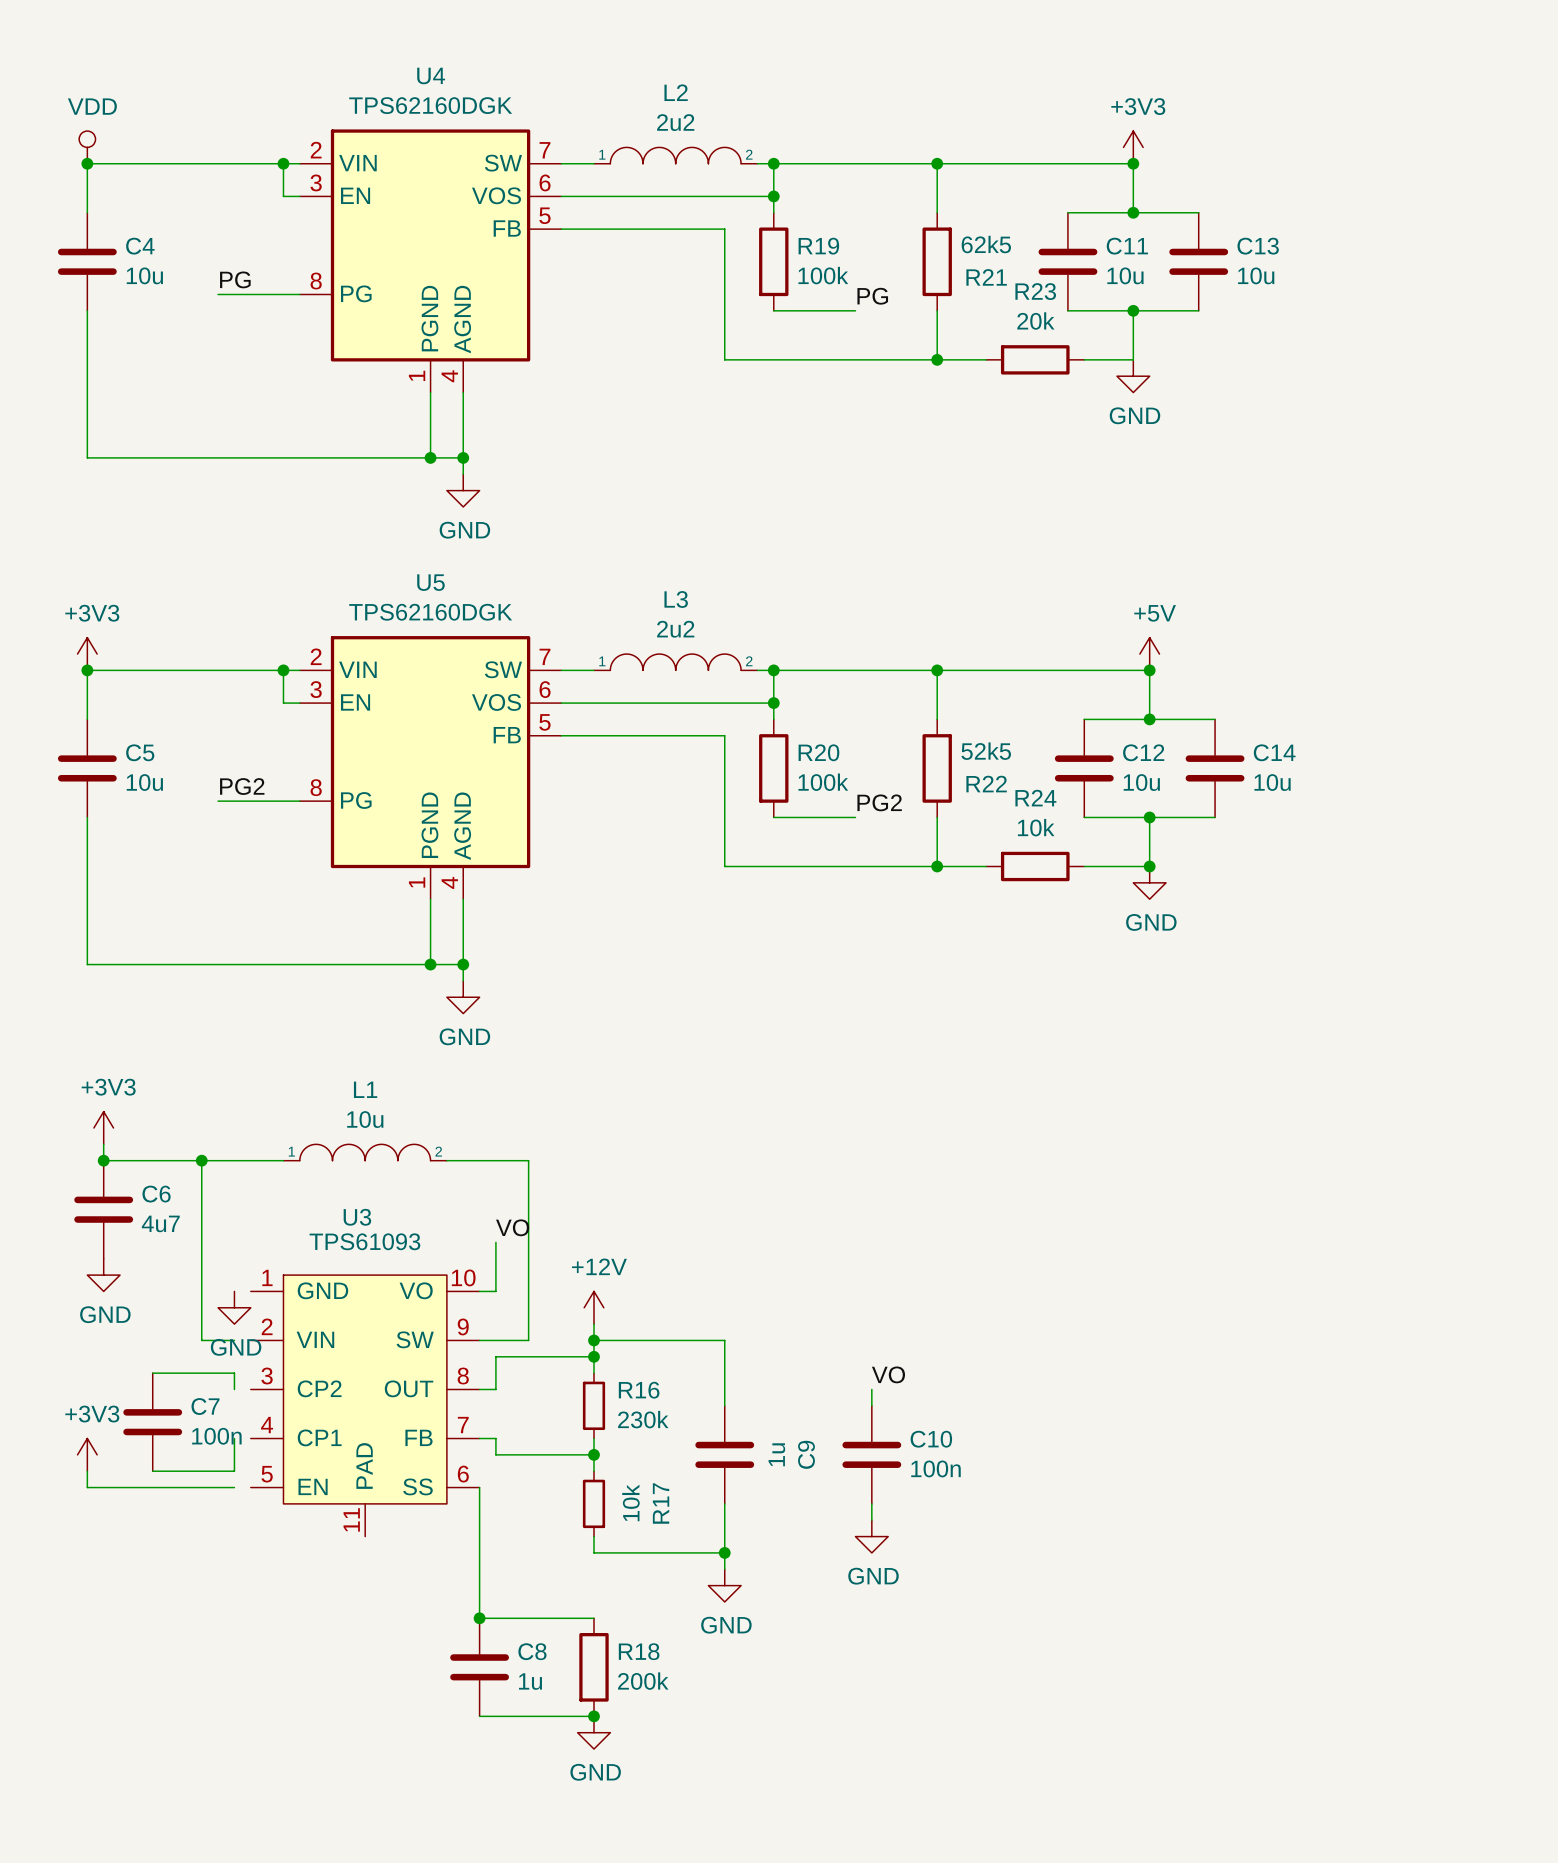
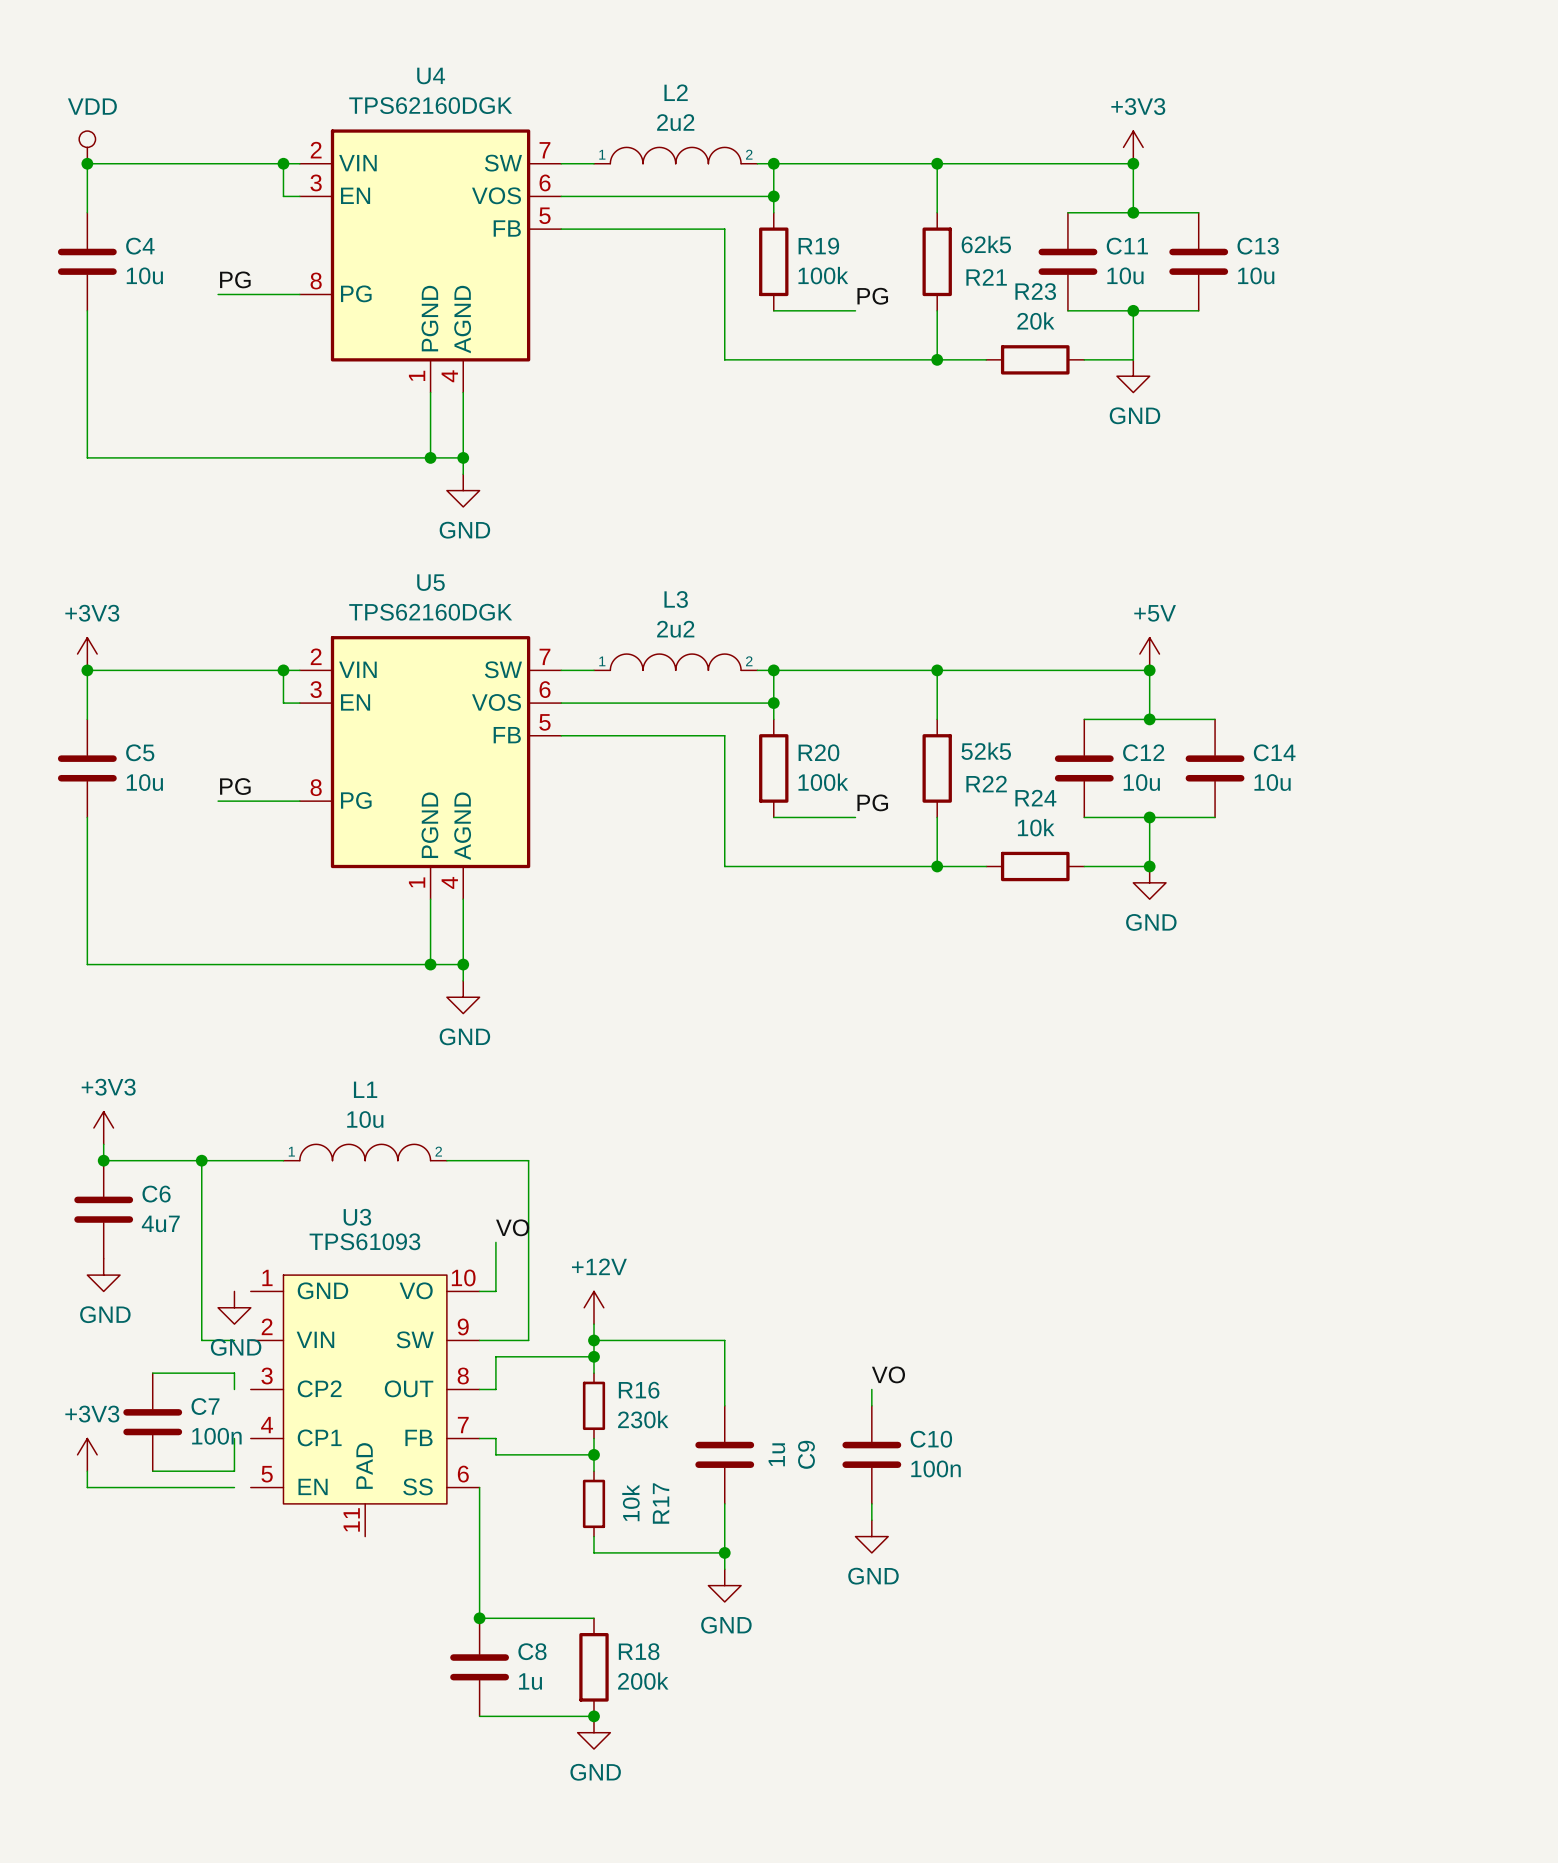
label: PG2 (242, 786) -> PG (235, 786)
label: PG2 (879, 802) -> PG (872, 802)

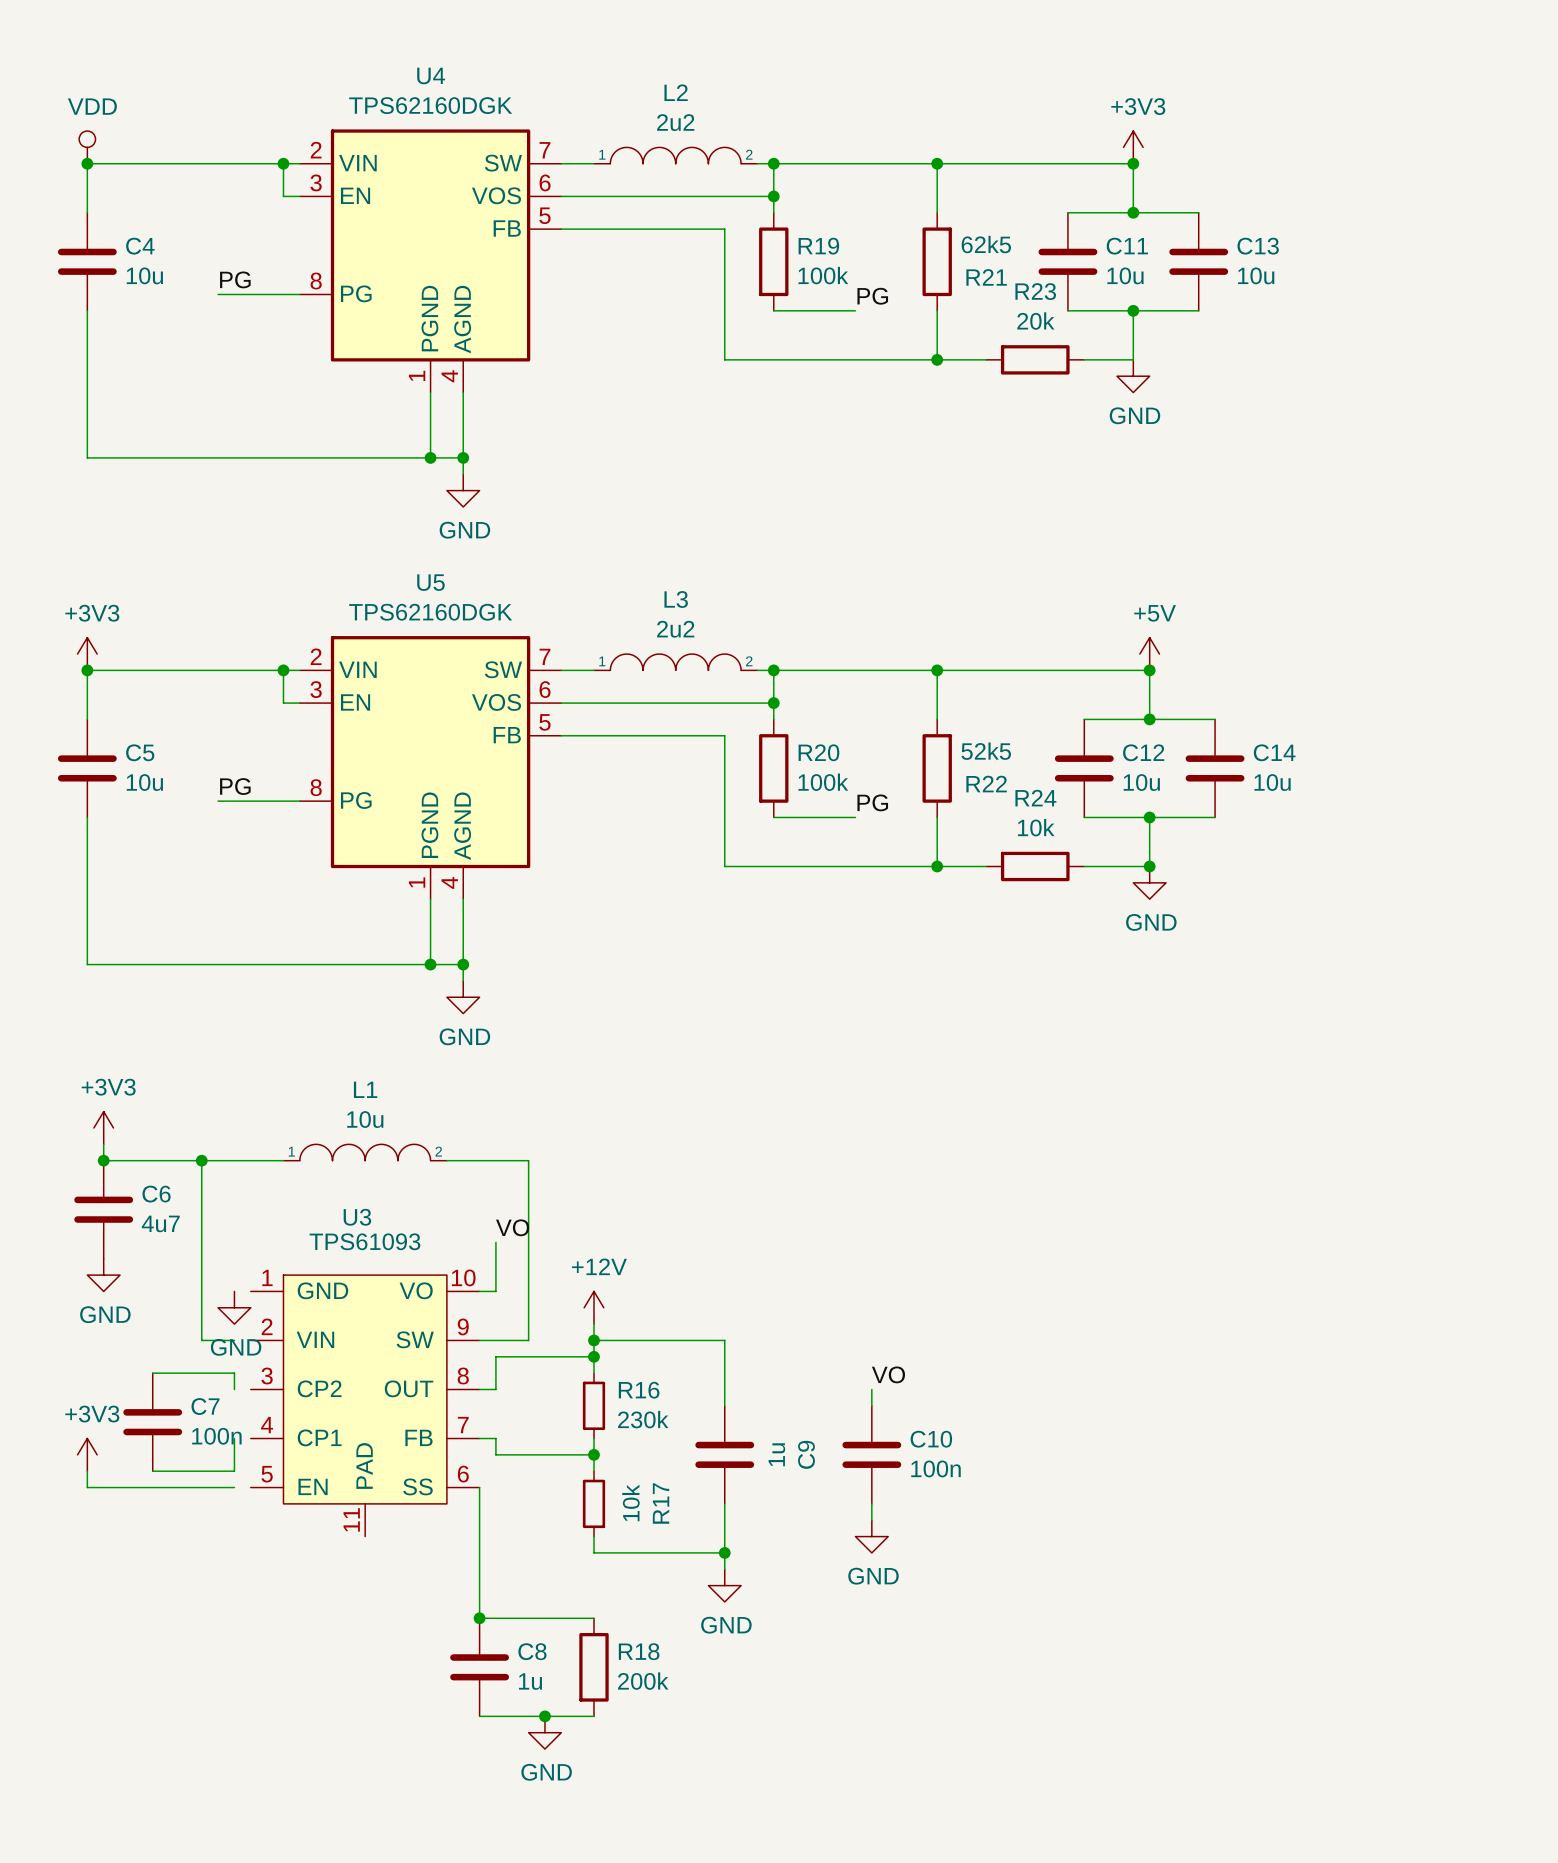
junction position: (593, 1716) -> (544, 1716)
power symbol position: GND (593, 1732) -> GND (544, 1732)

